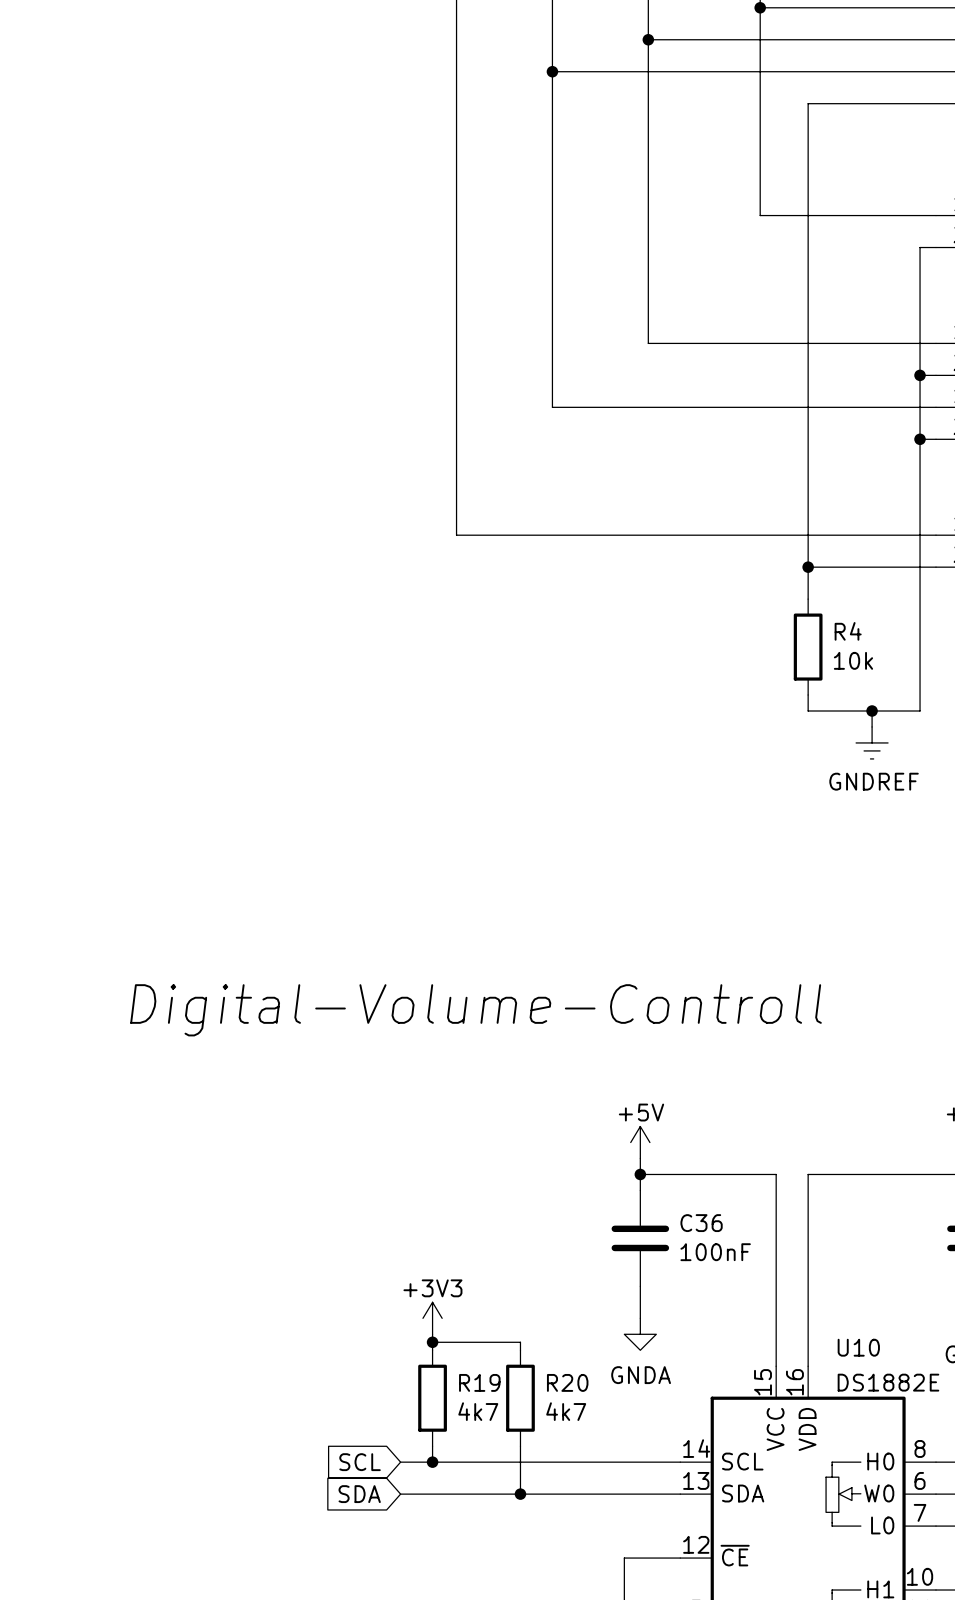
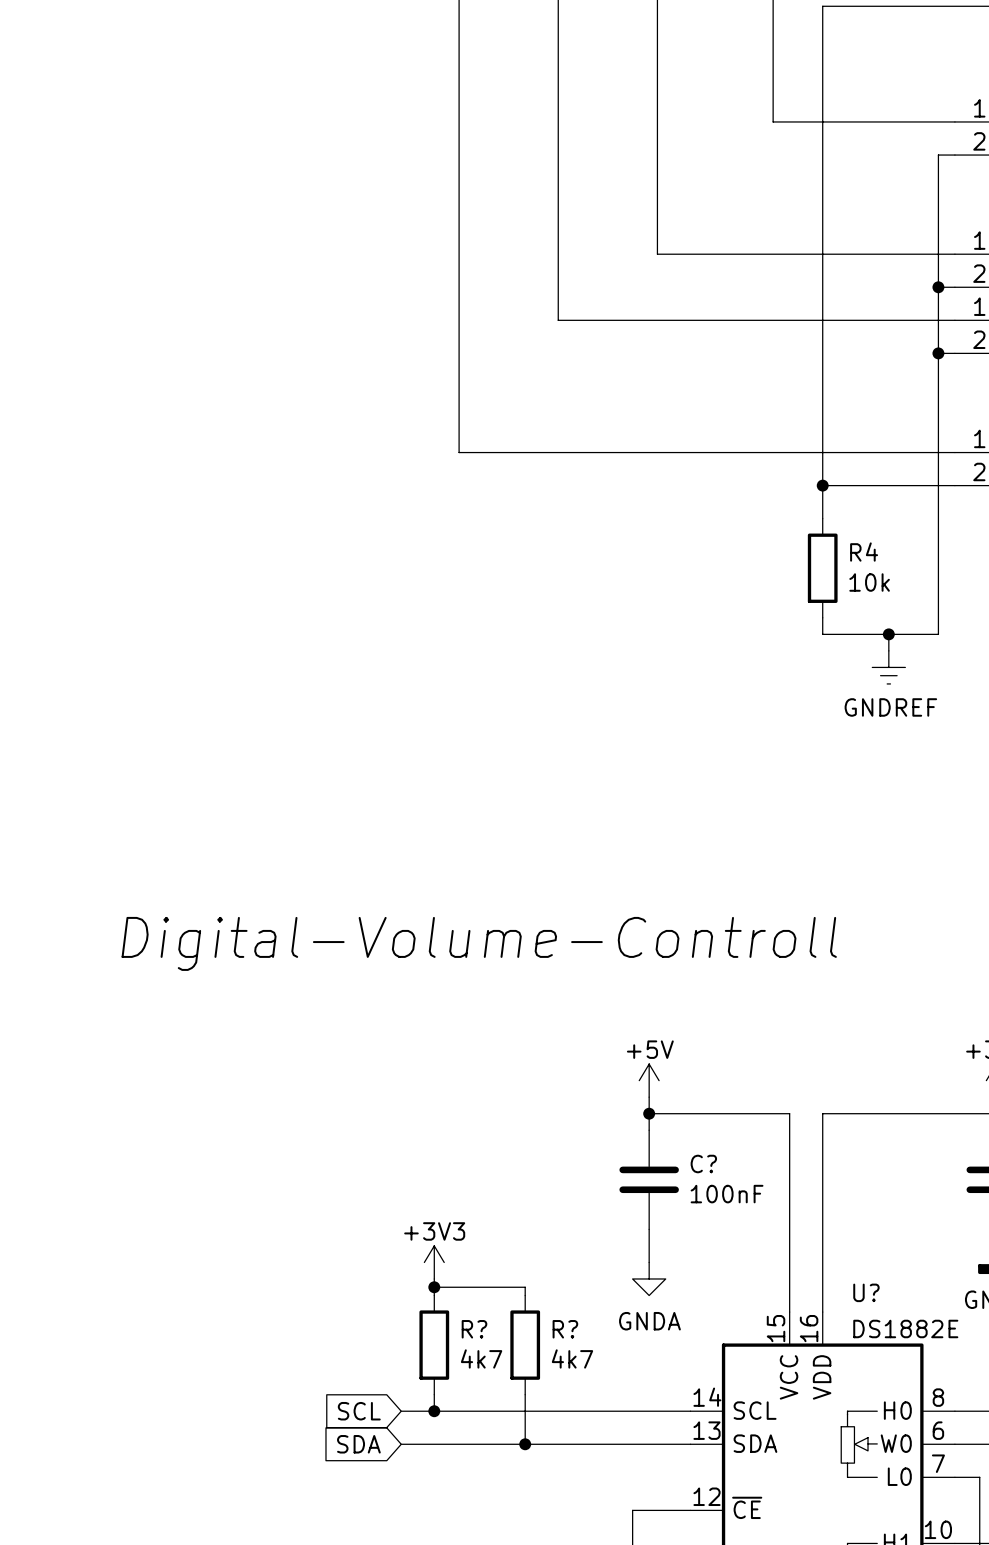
C36 name: C36 (701, 1223) -> C? (703, 1163)
U10 name: U10 (858, 1347) -> U? (866, 1292)
R19 name: R19 (479, 1382) -> R? (474, 1329)
R20 name: R20 (567, 1382) -> R? (565, 1329)

